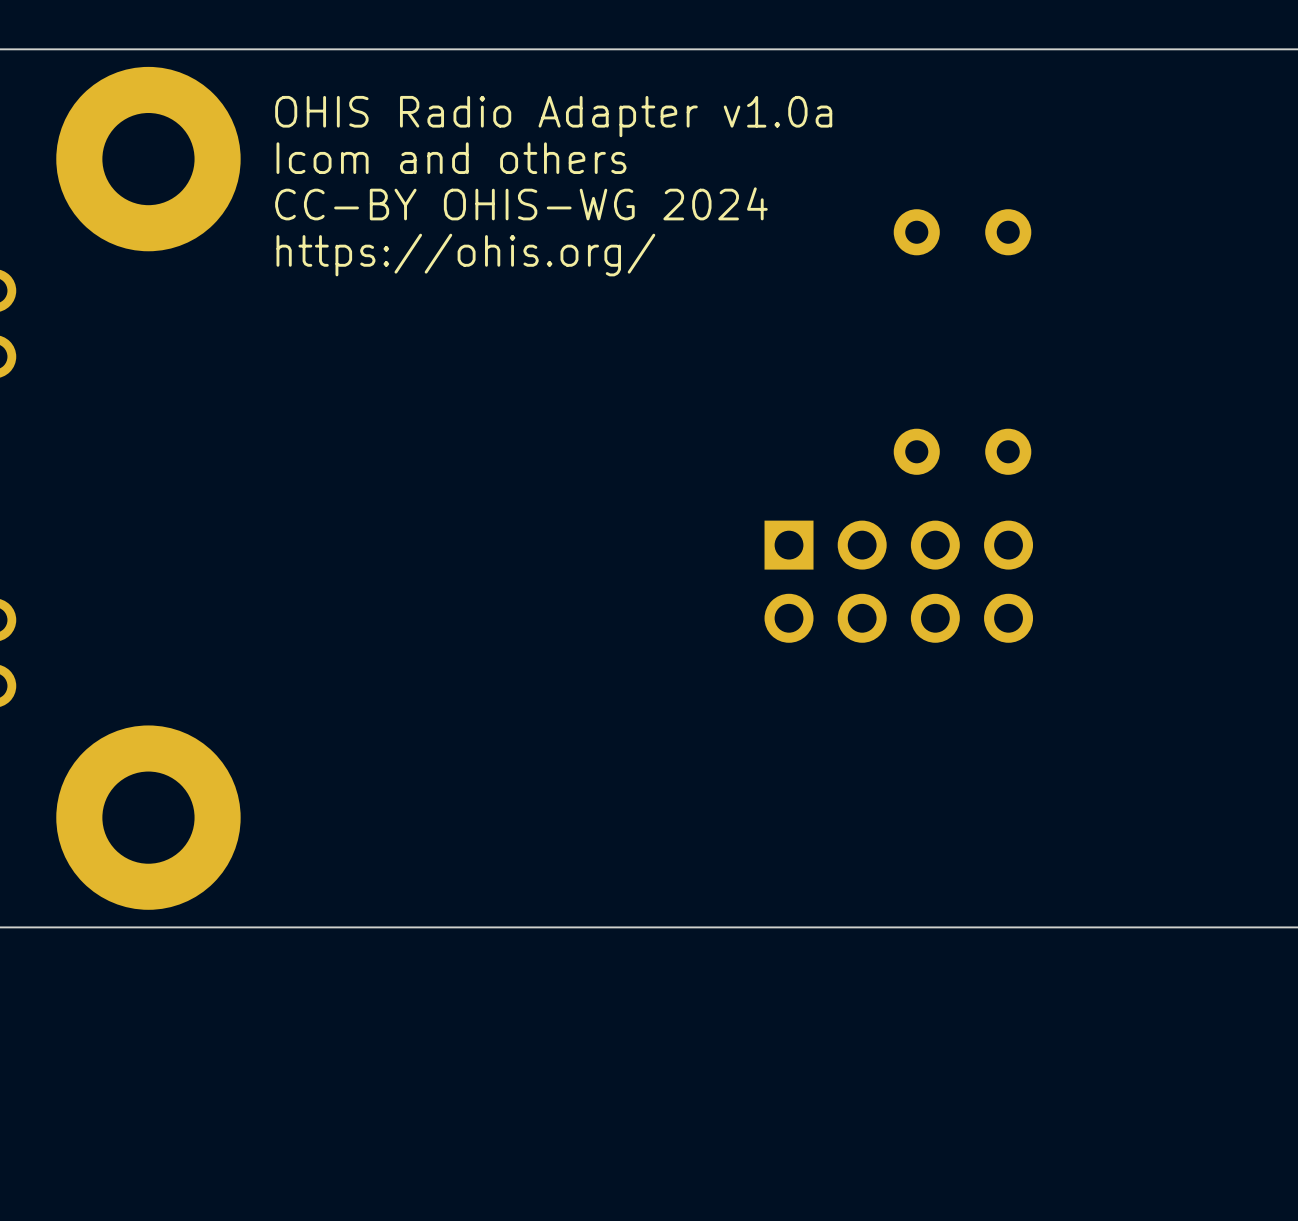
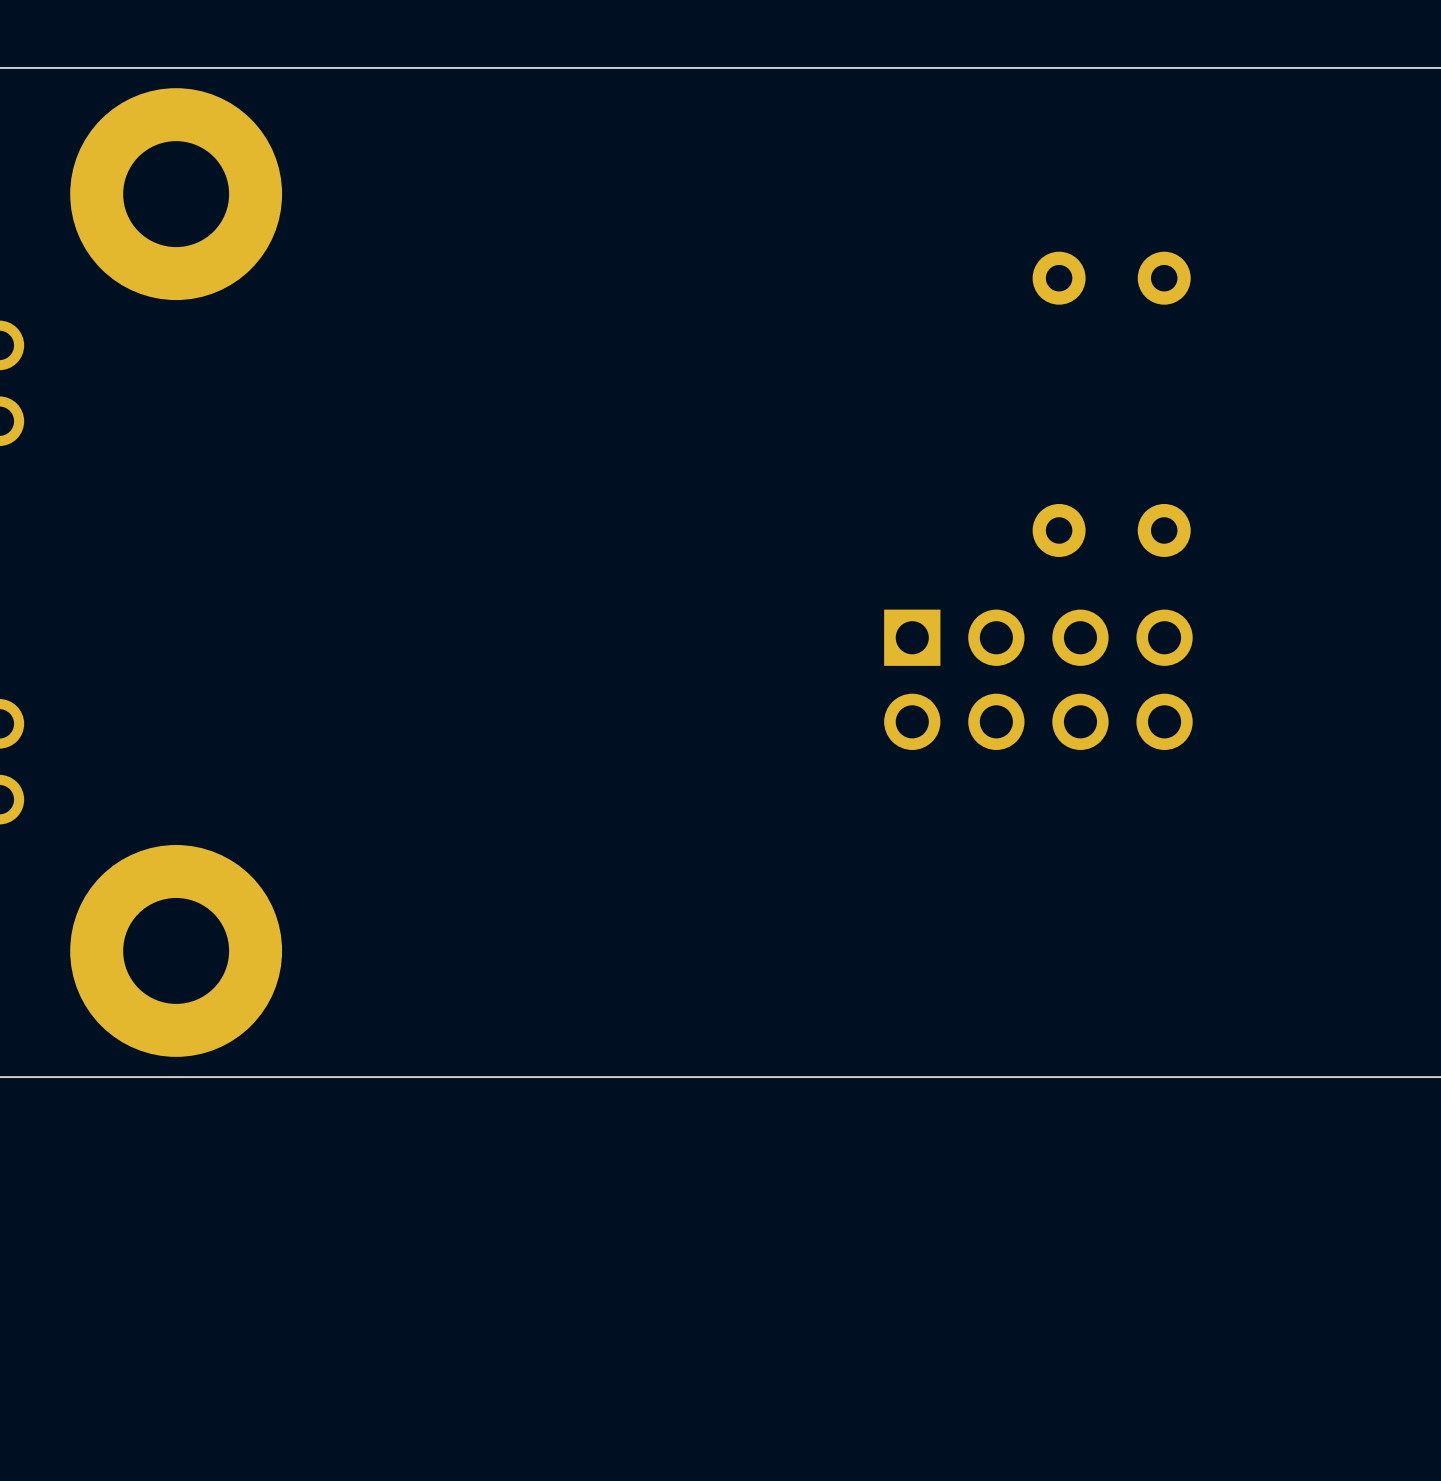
text: OHIS Radio Adapter v1.0a (553, 116) -> none
text: Icom and others (451, 158) -> none
text: CC-BY OHIS-WG 2024 (521, 203) -> none
text: https://ohis.org/ (465, 255) -> none

